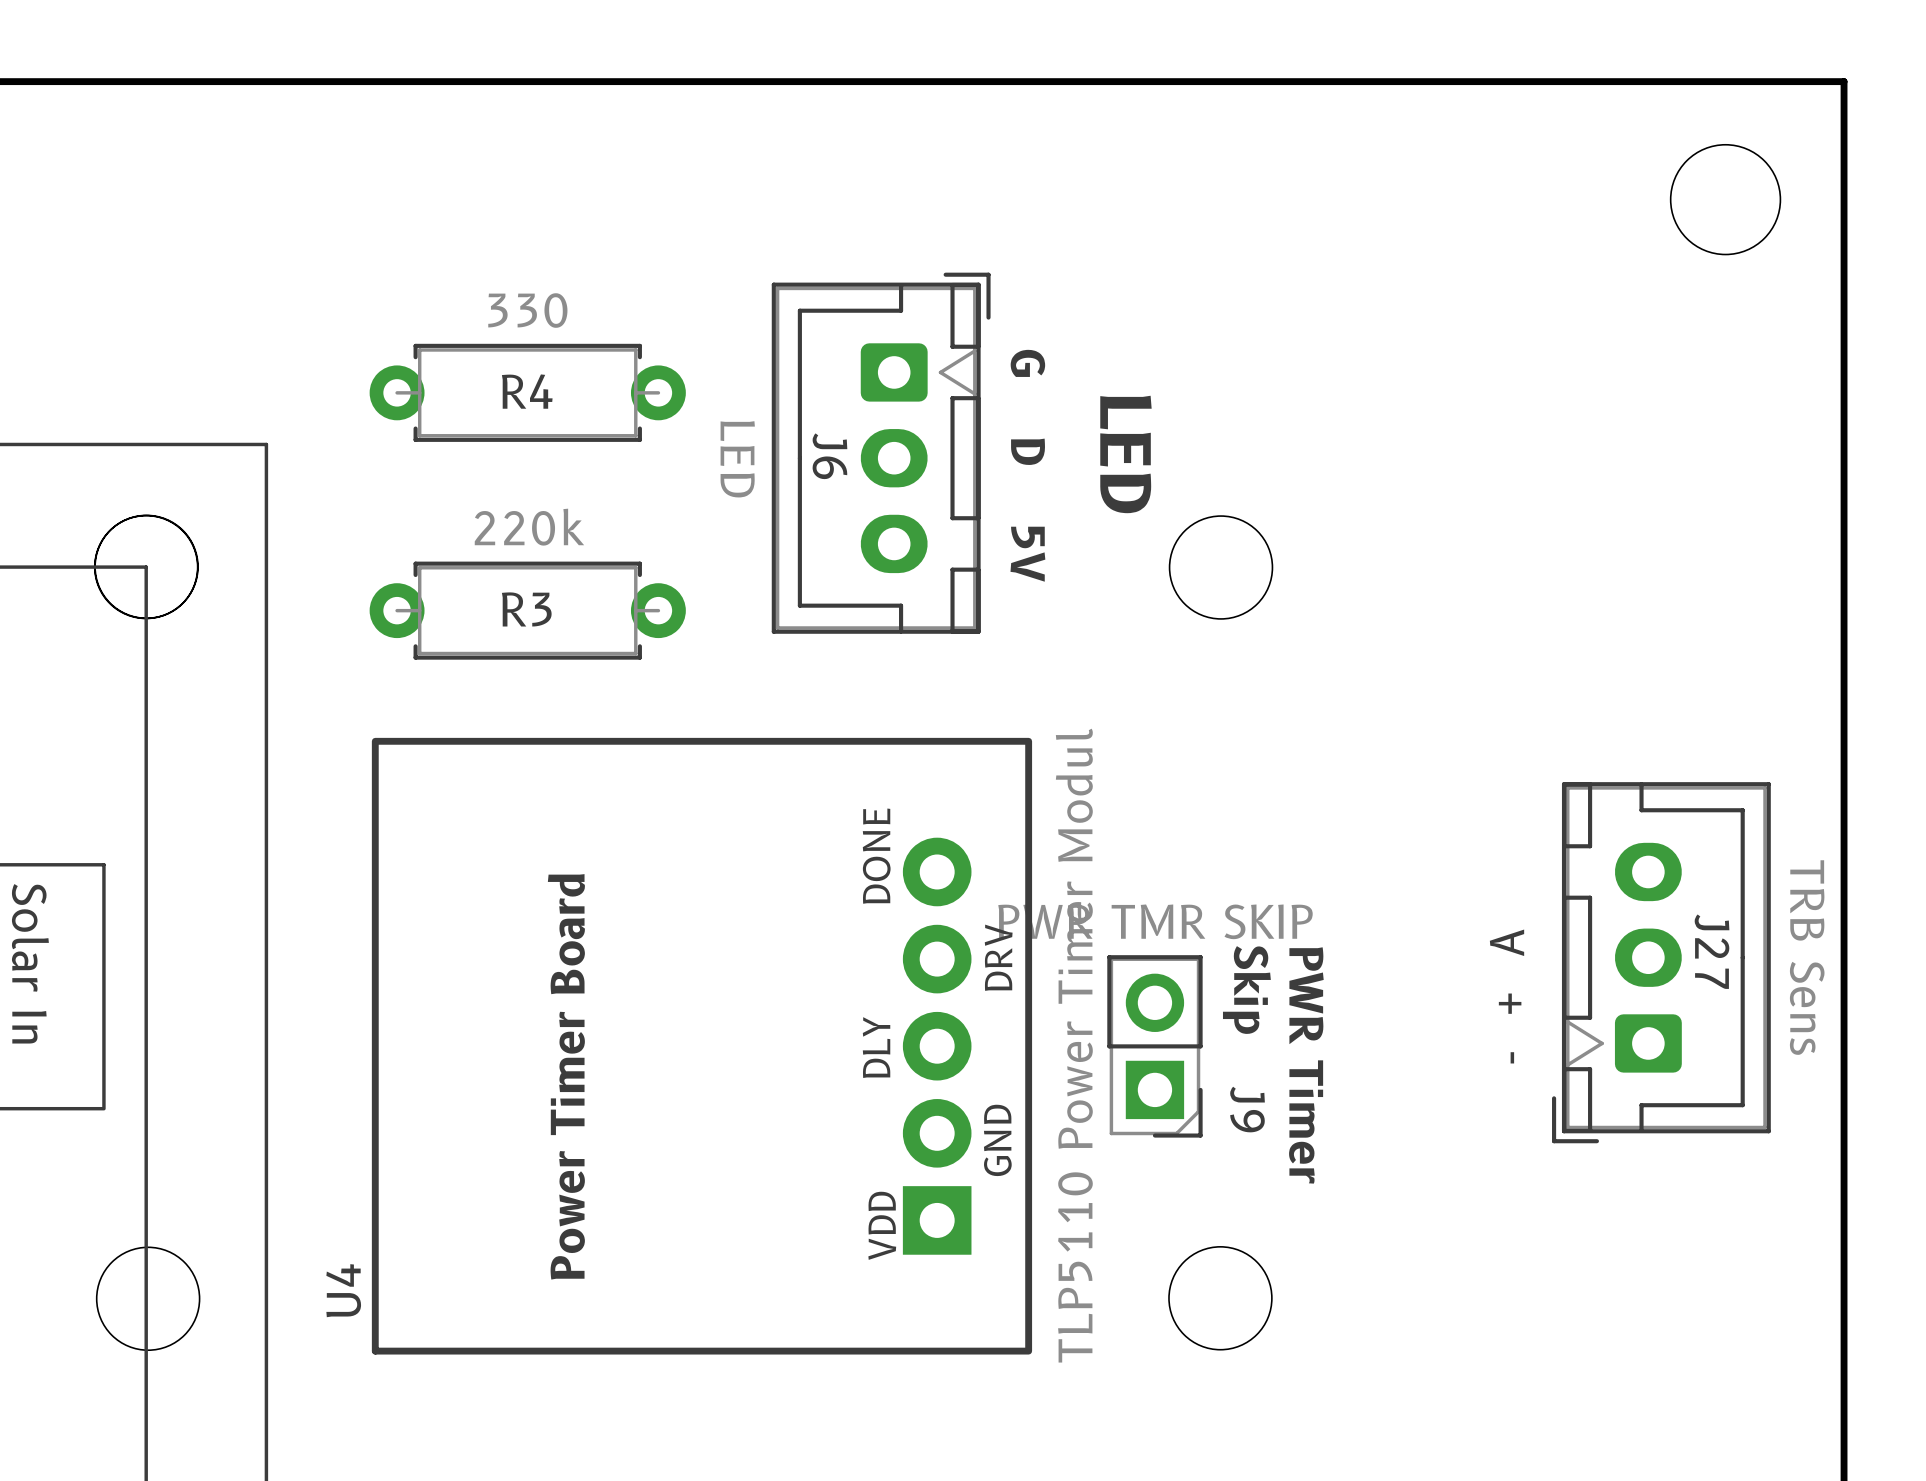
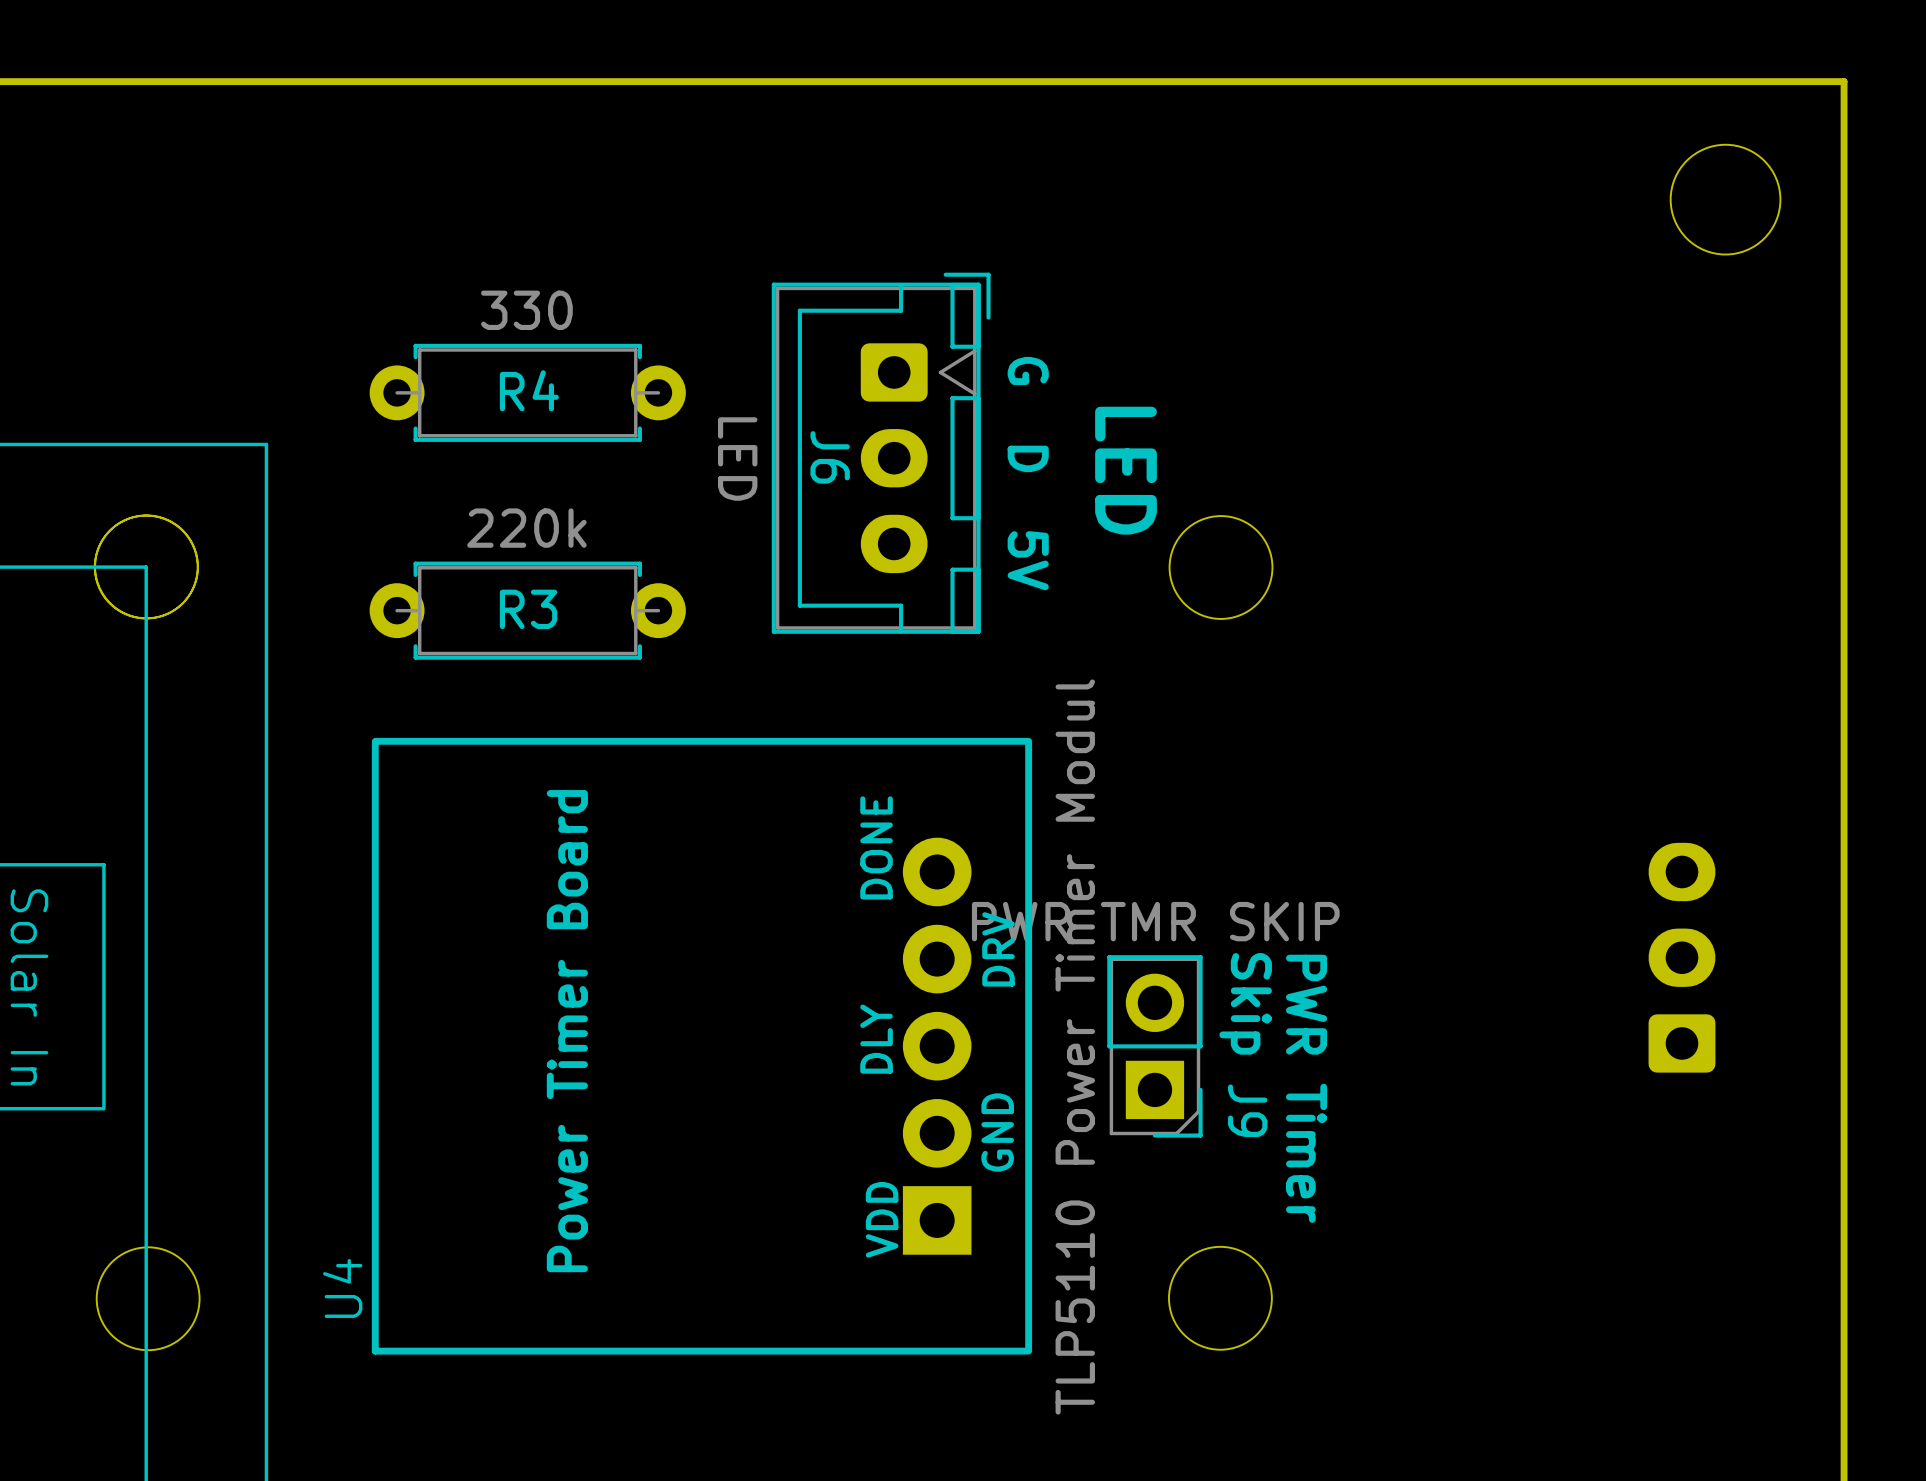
J27 side: bottom (1661, 962) -> top (1681, 957)
text: - + A (1507, 996) -> none

